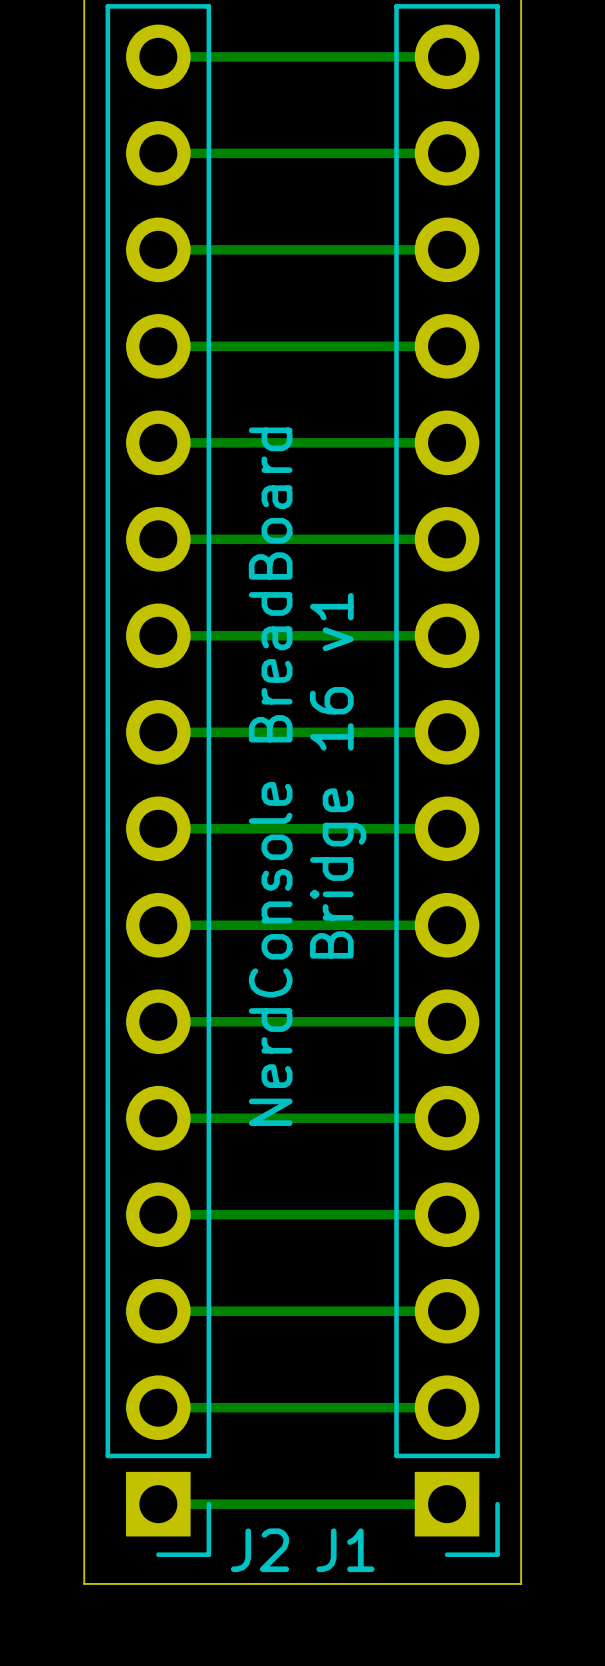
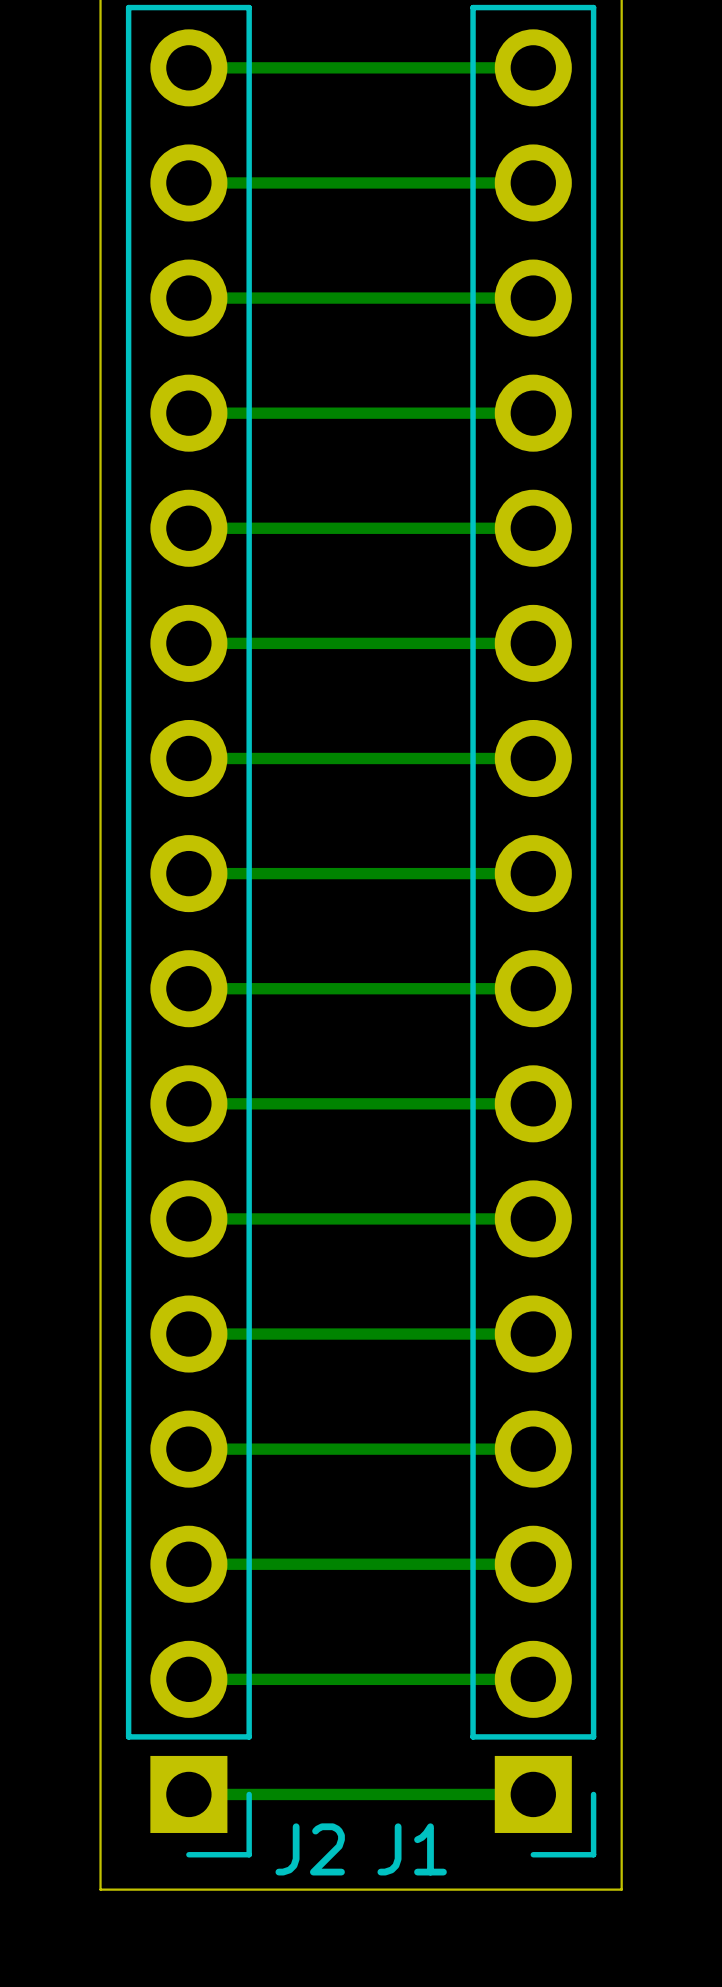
text: Bridge 16 v1 (338, 775) -> none
text: NerdConsole BreadBoard (270, 776) -> none

